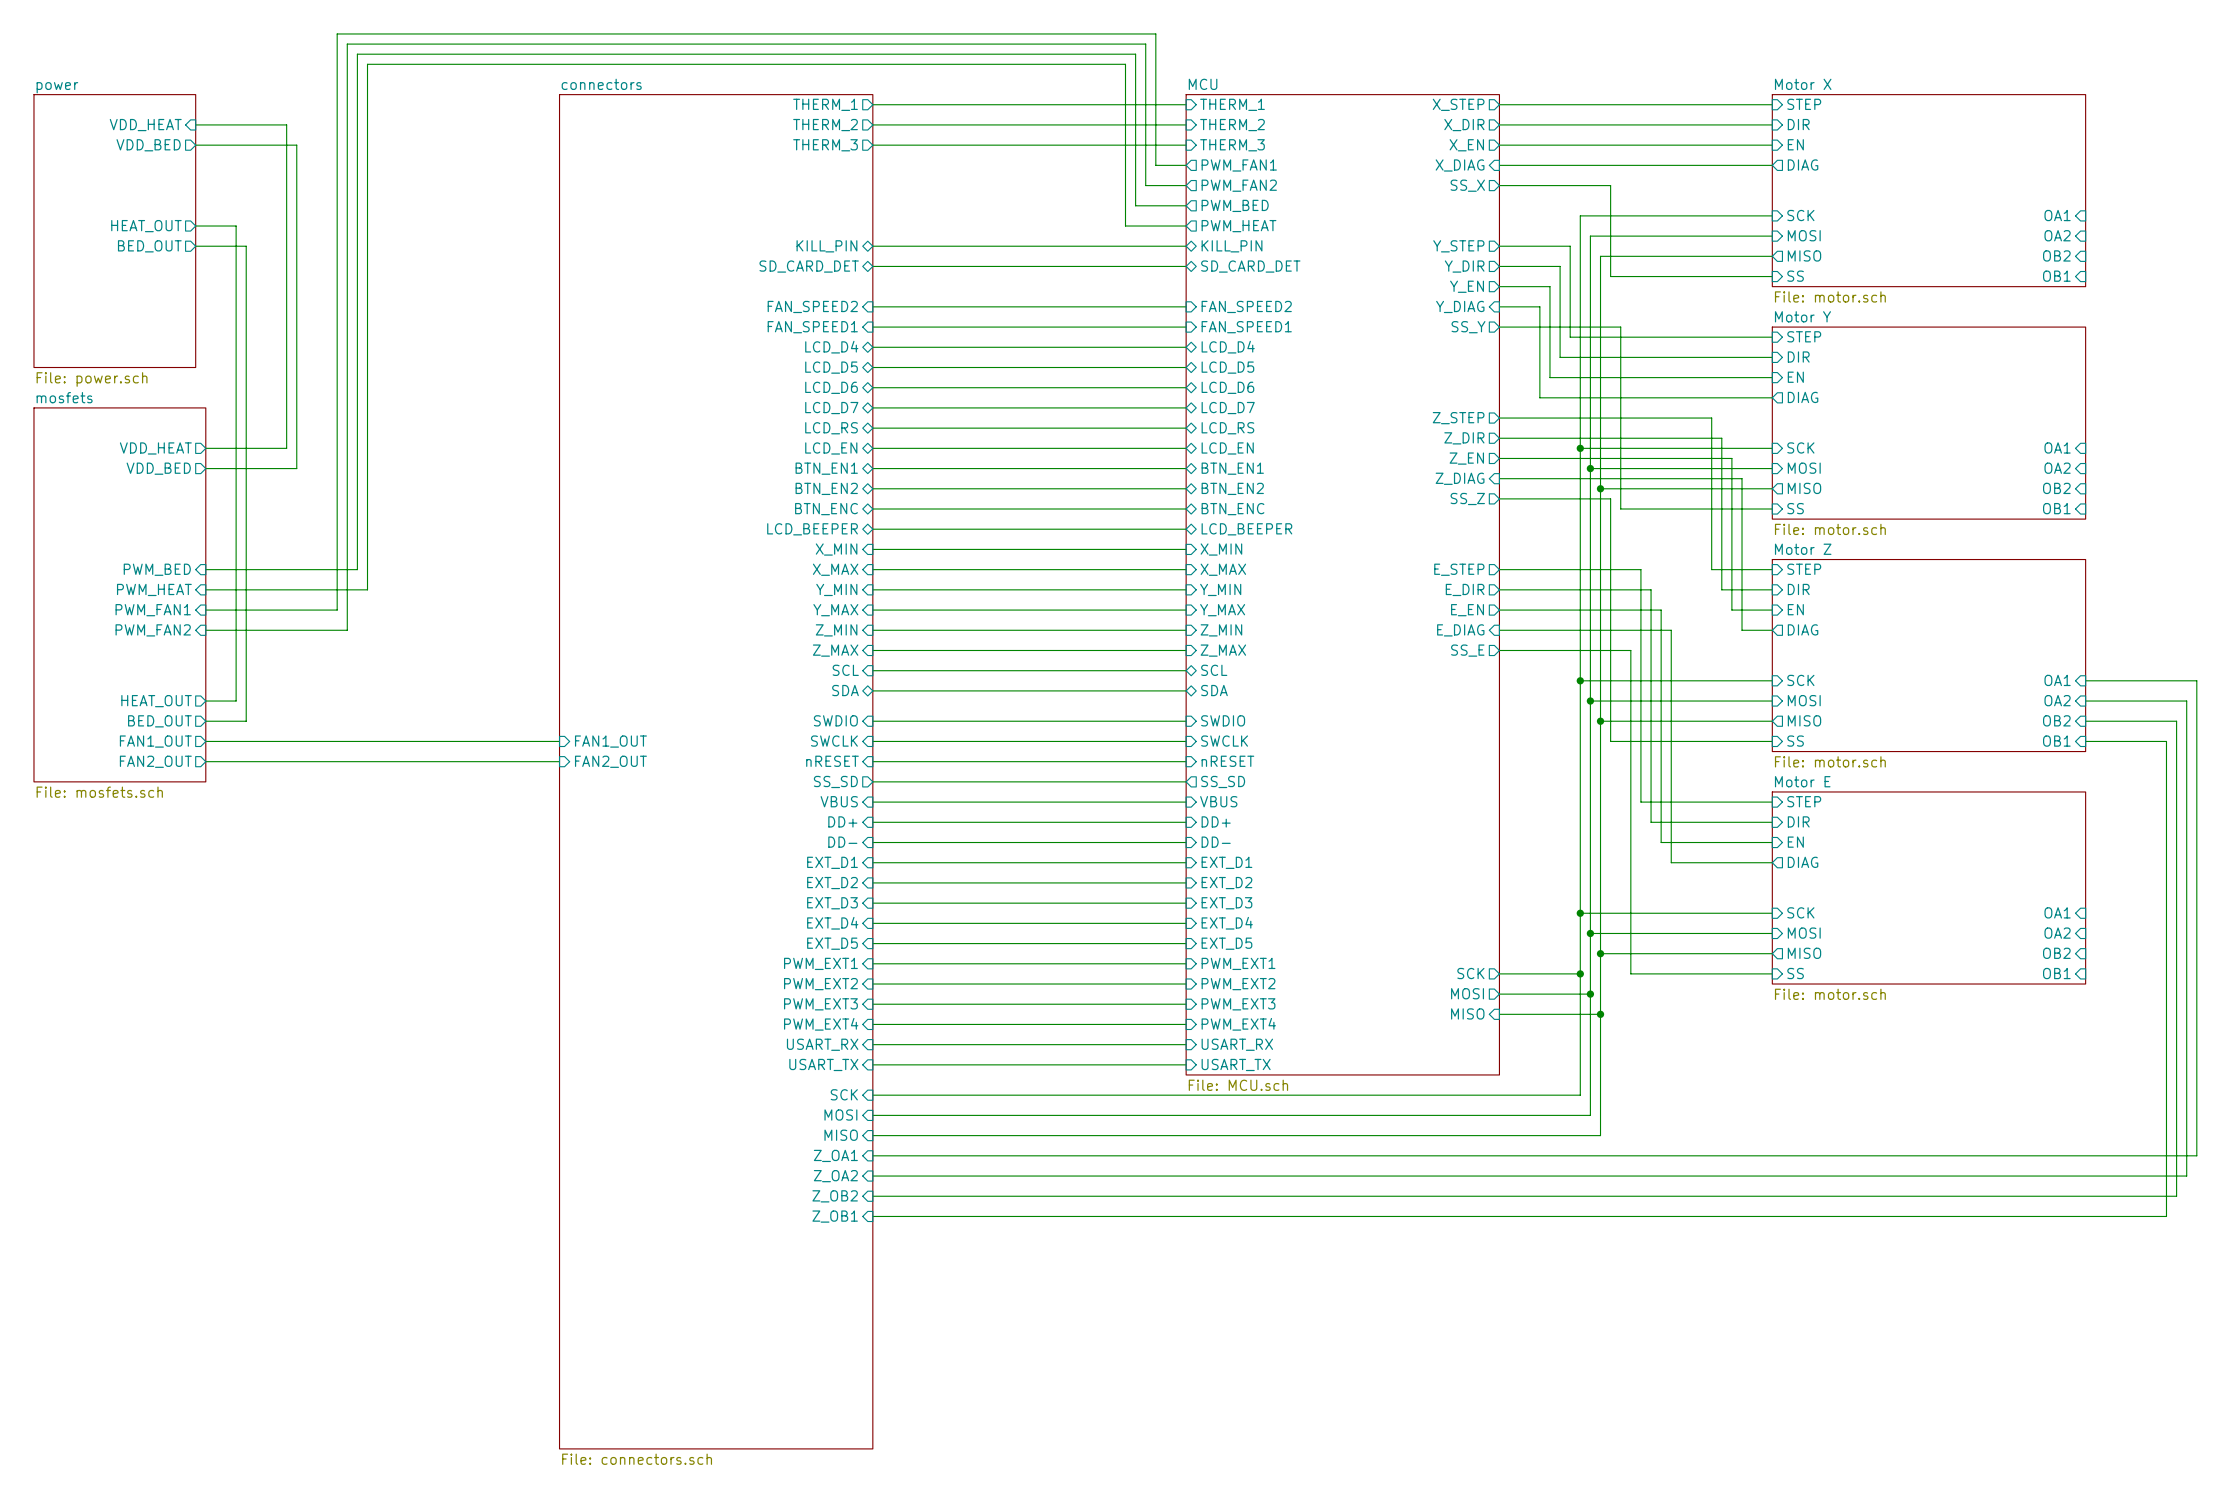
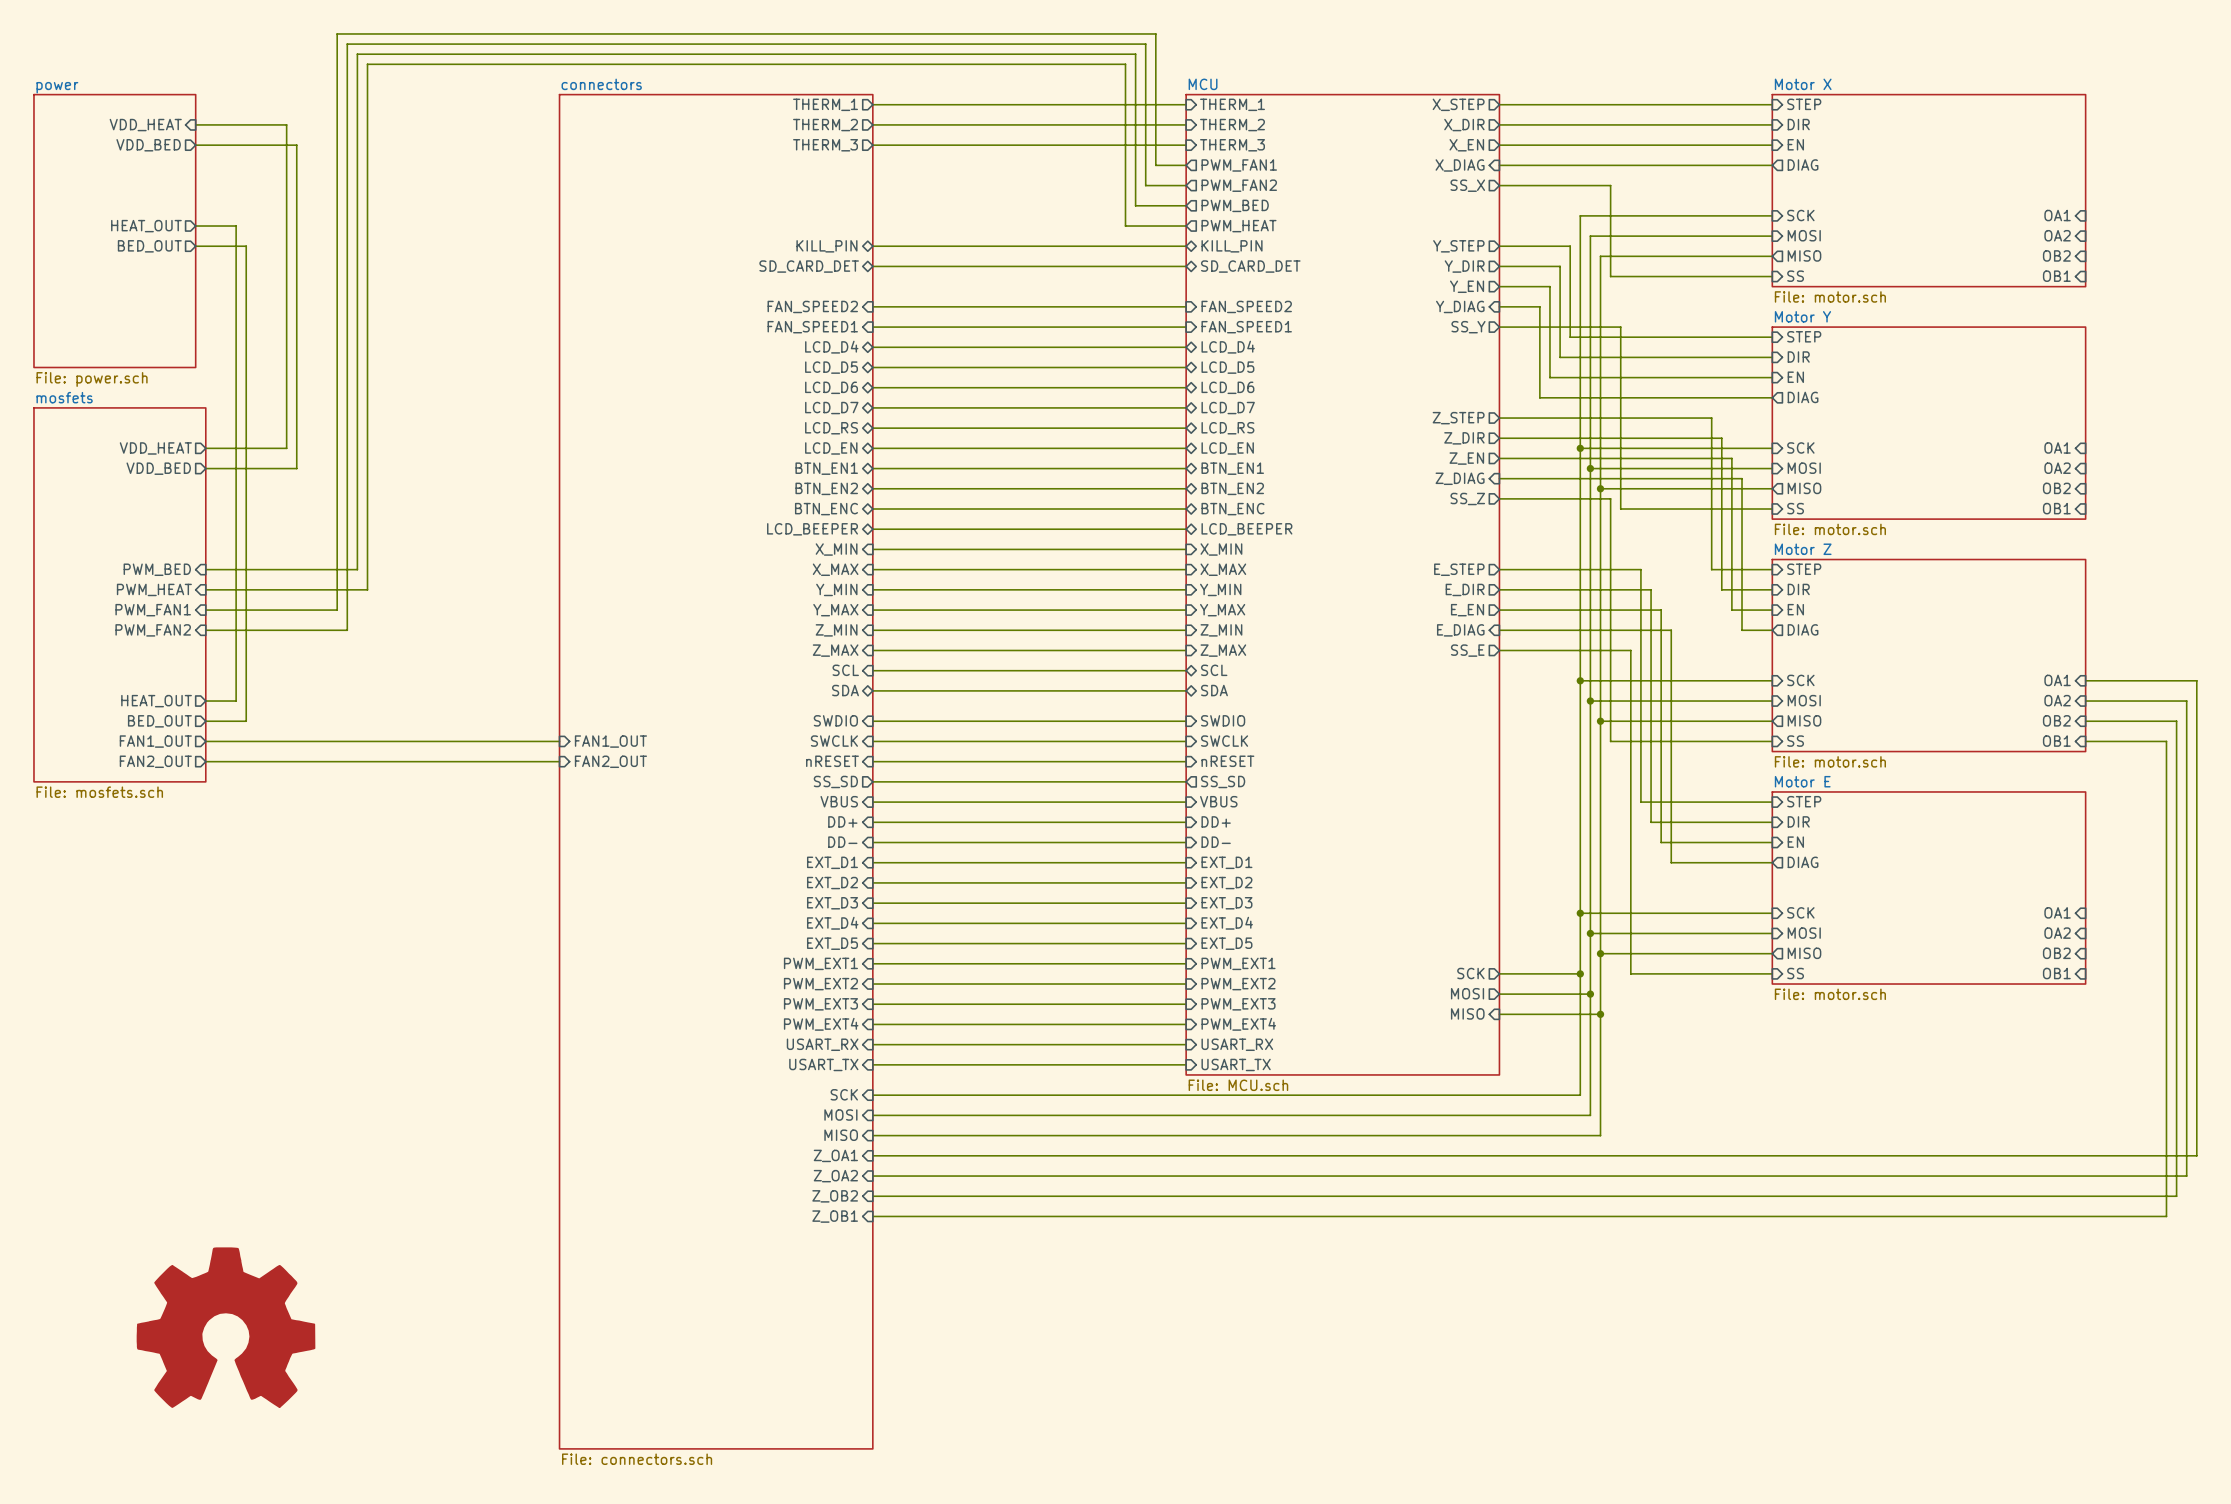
part: none -> (226, 1327)

